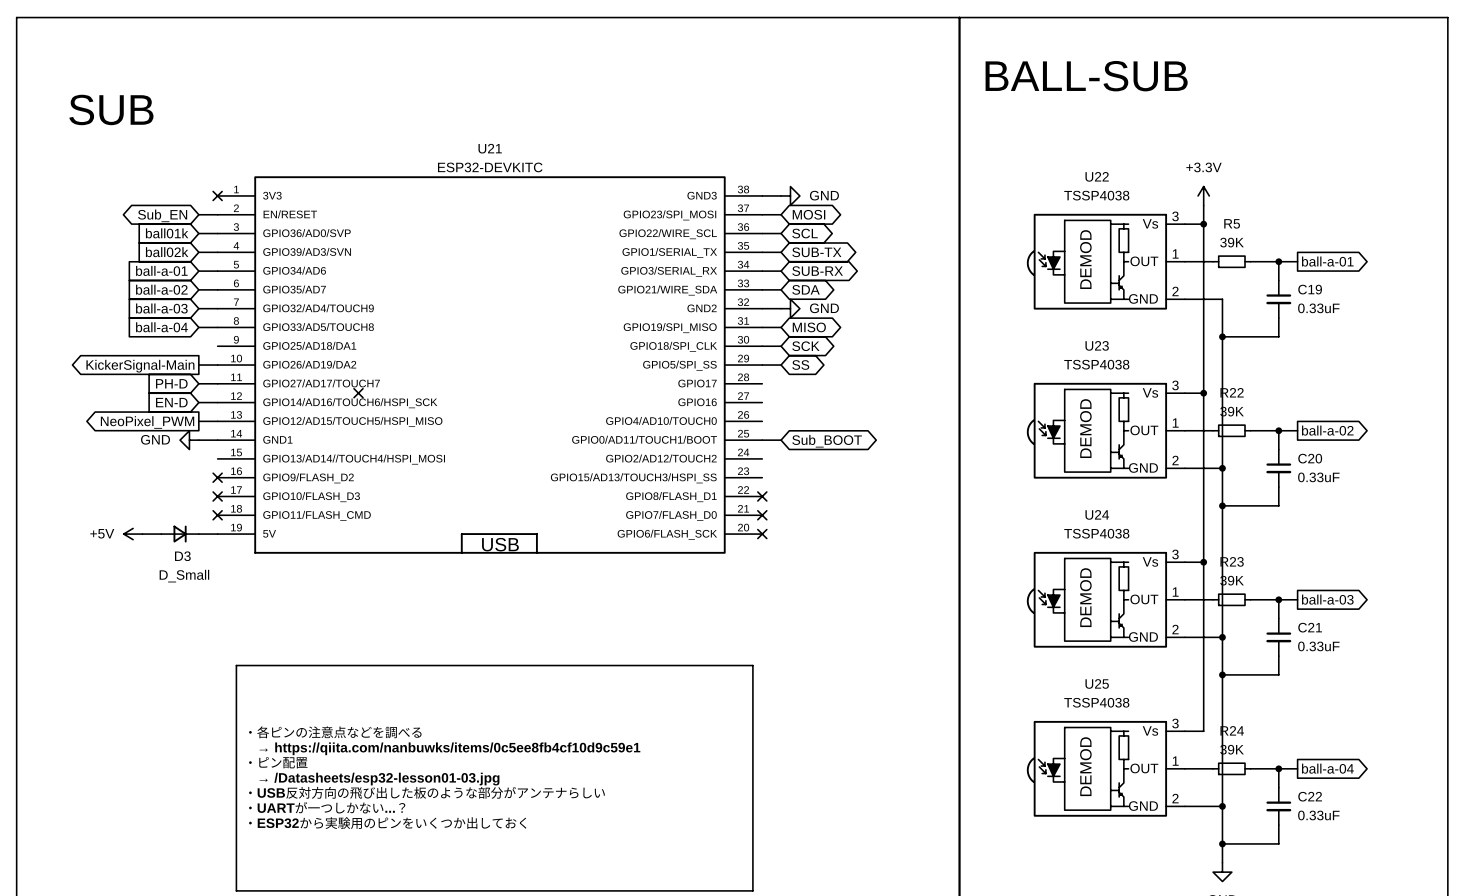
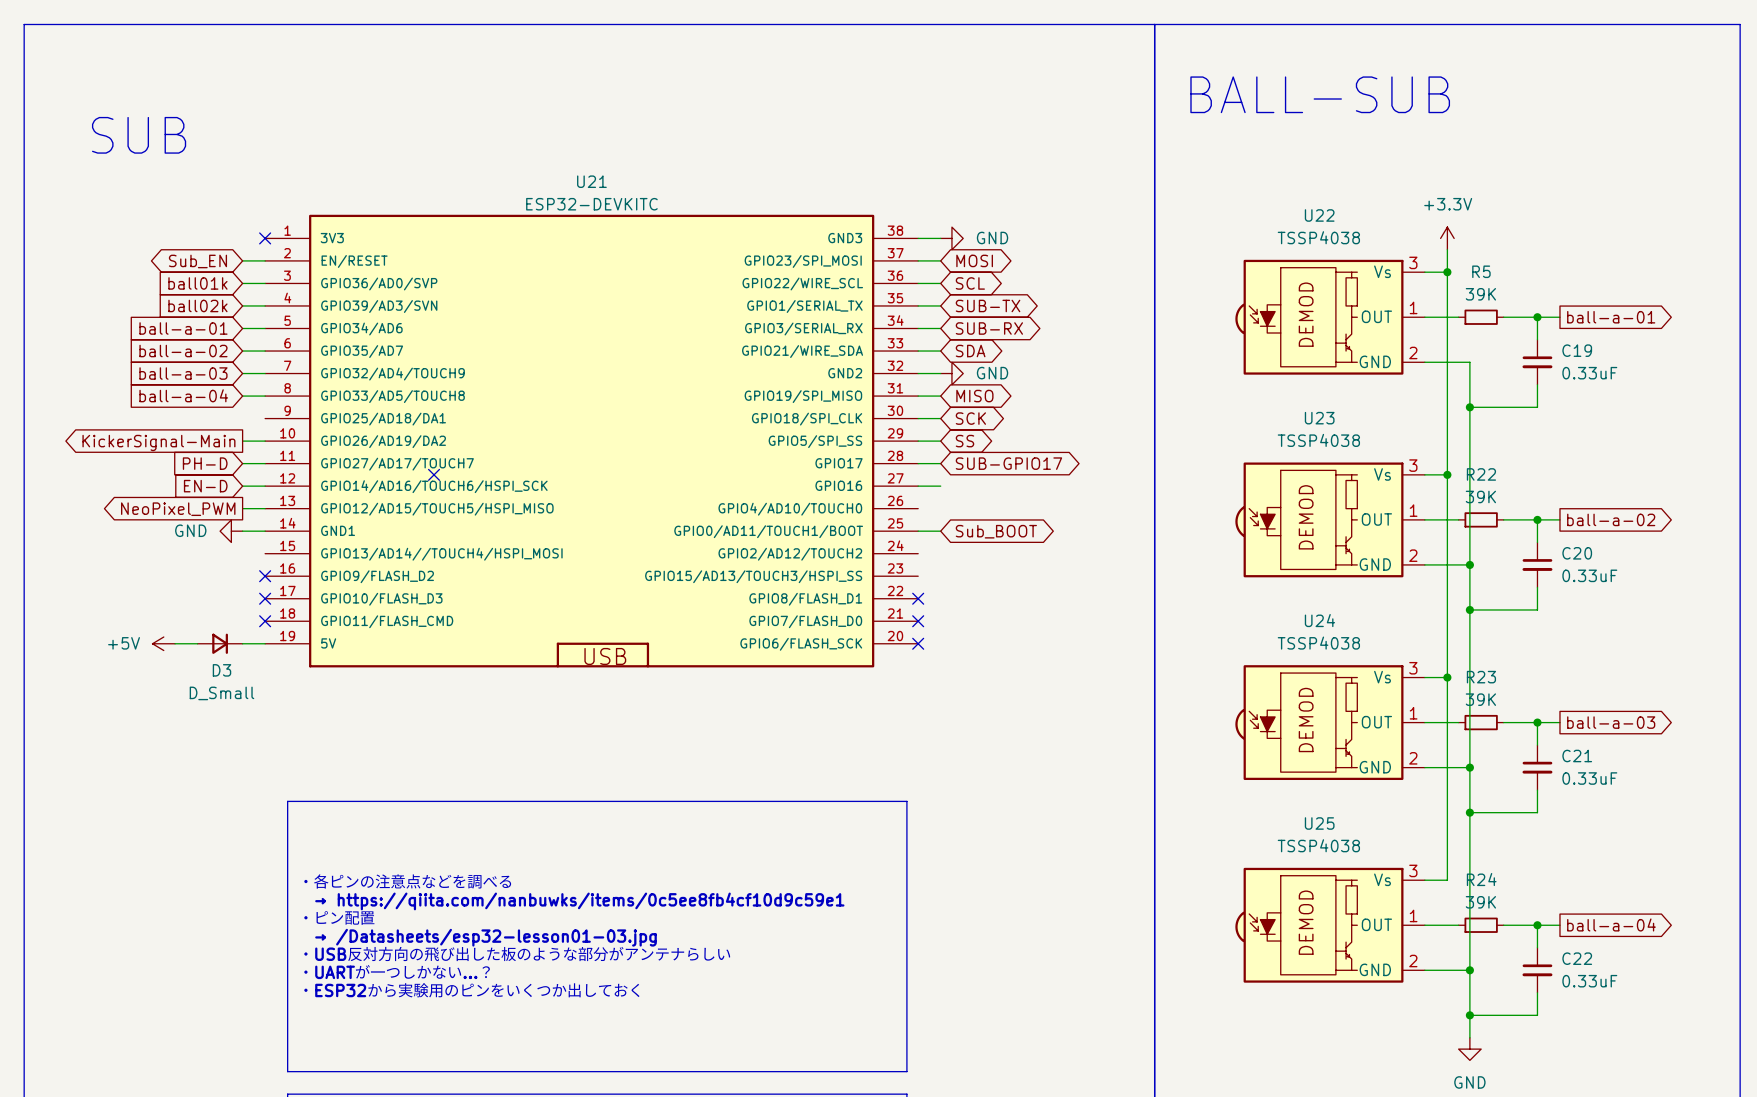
wire: none -> (918, 463) (940, 463)
global label: none -> SUB-GPIO17 (1008, 463)
wire: none -> (918, 486) (940, 486)

